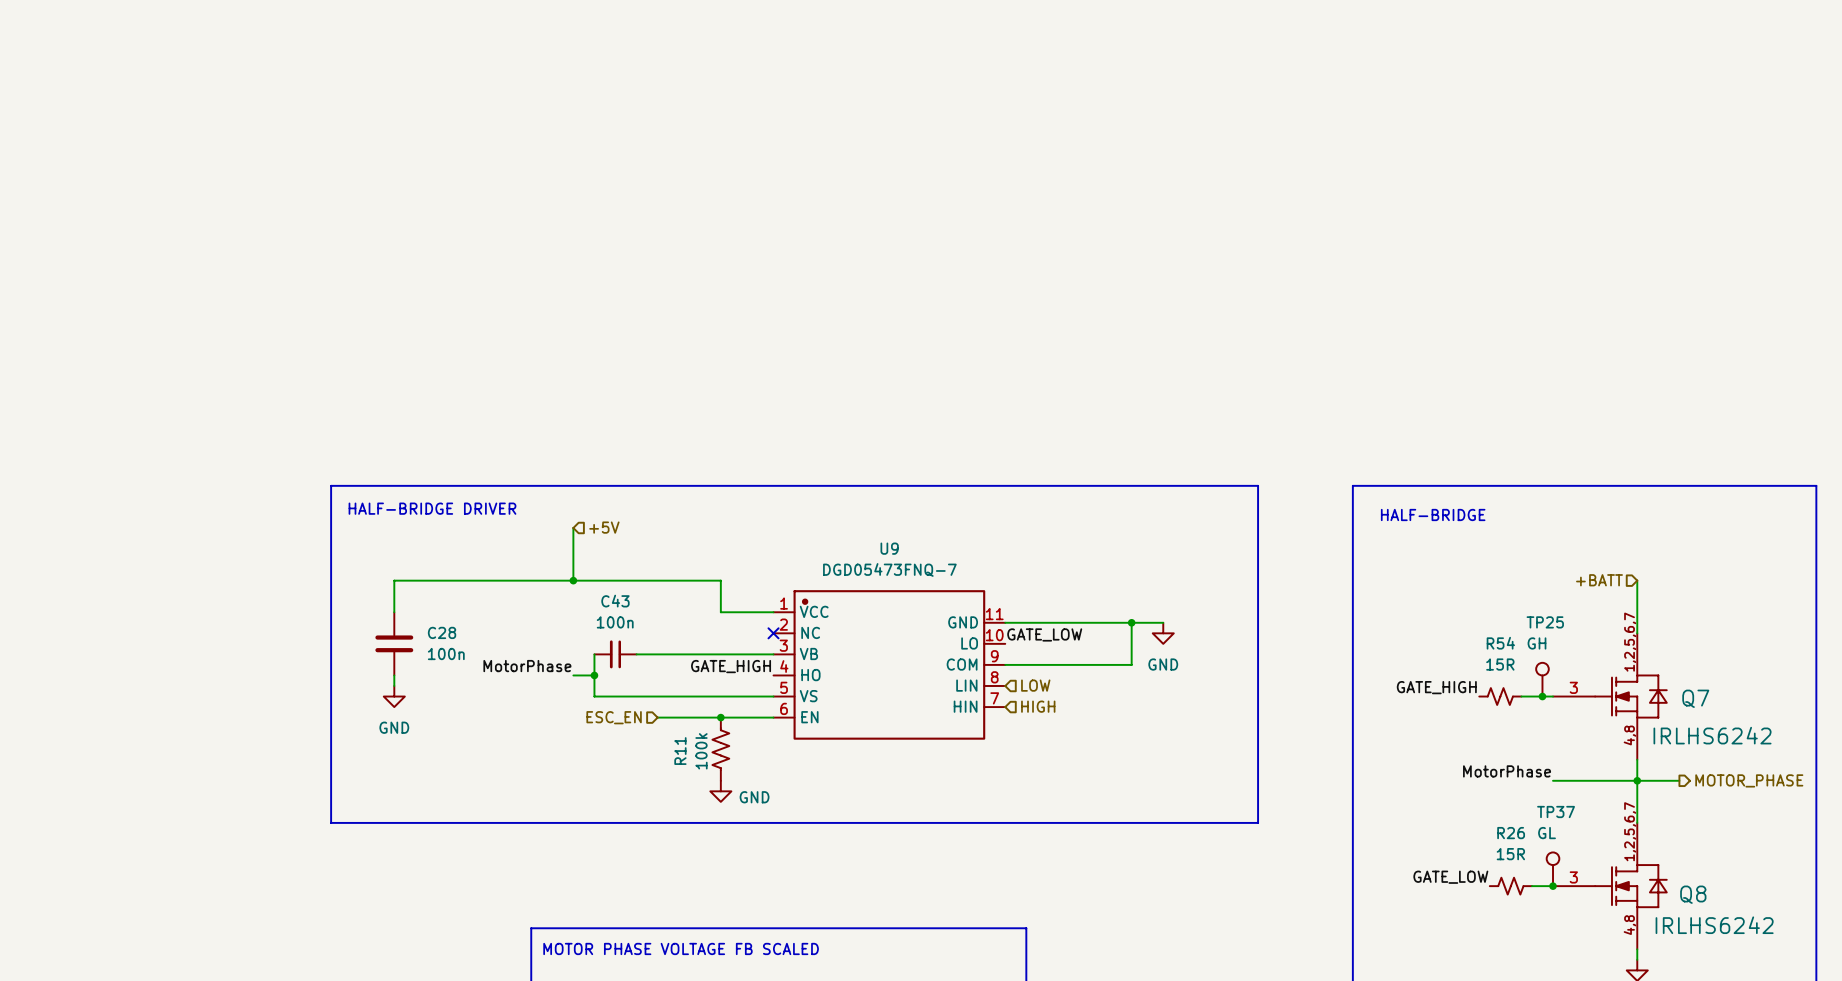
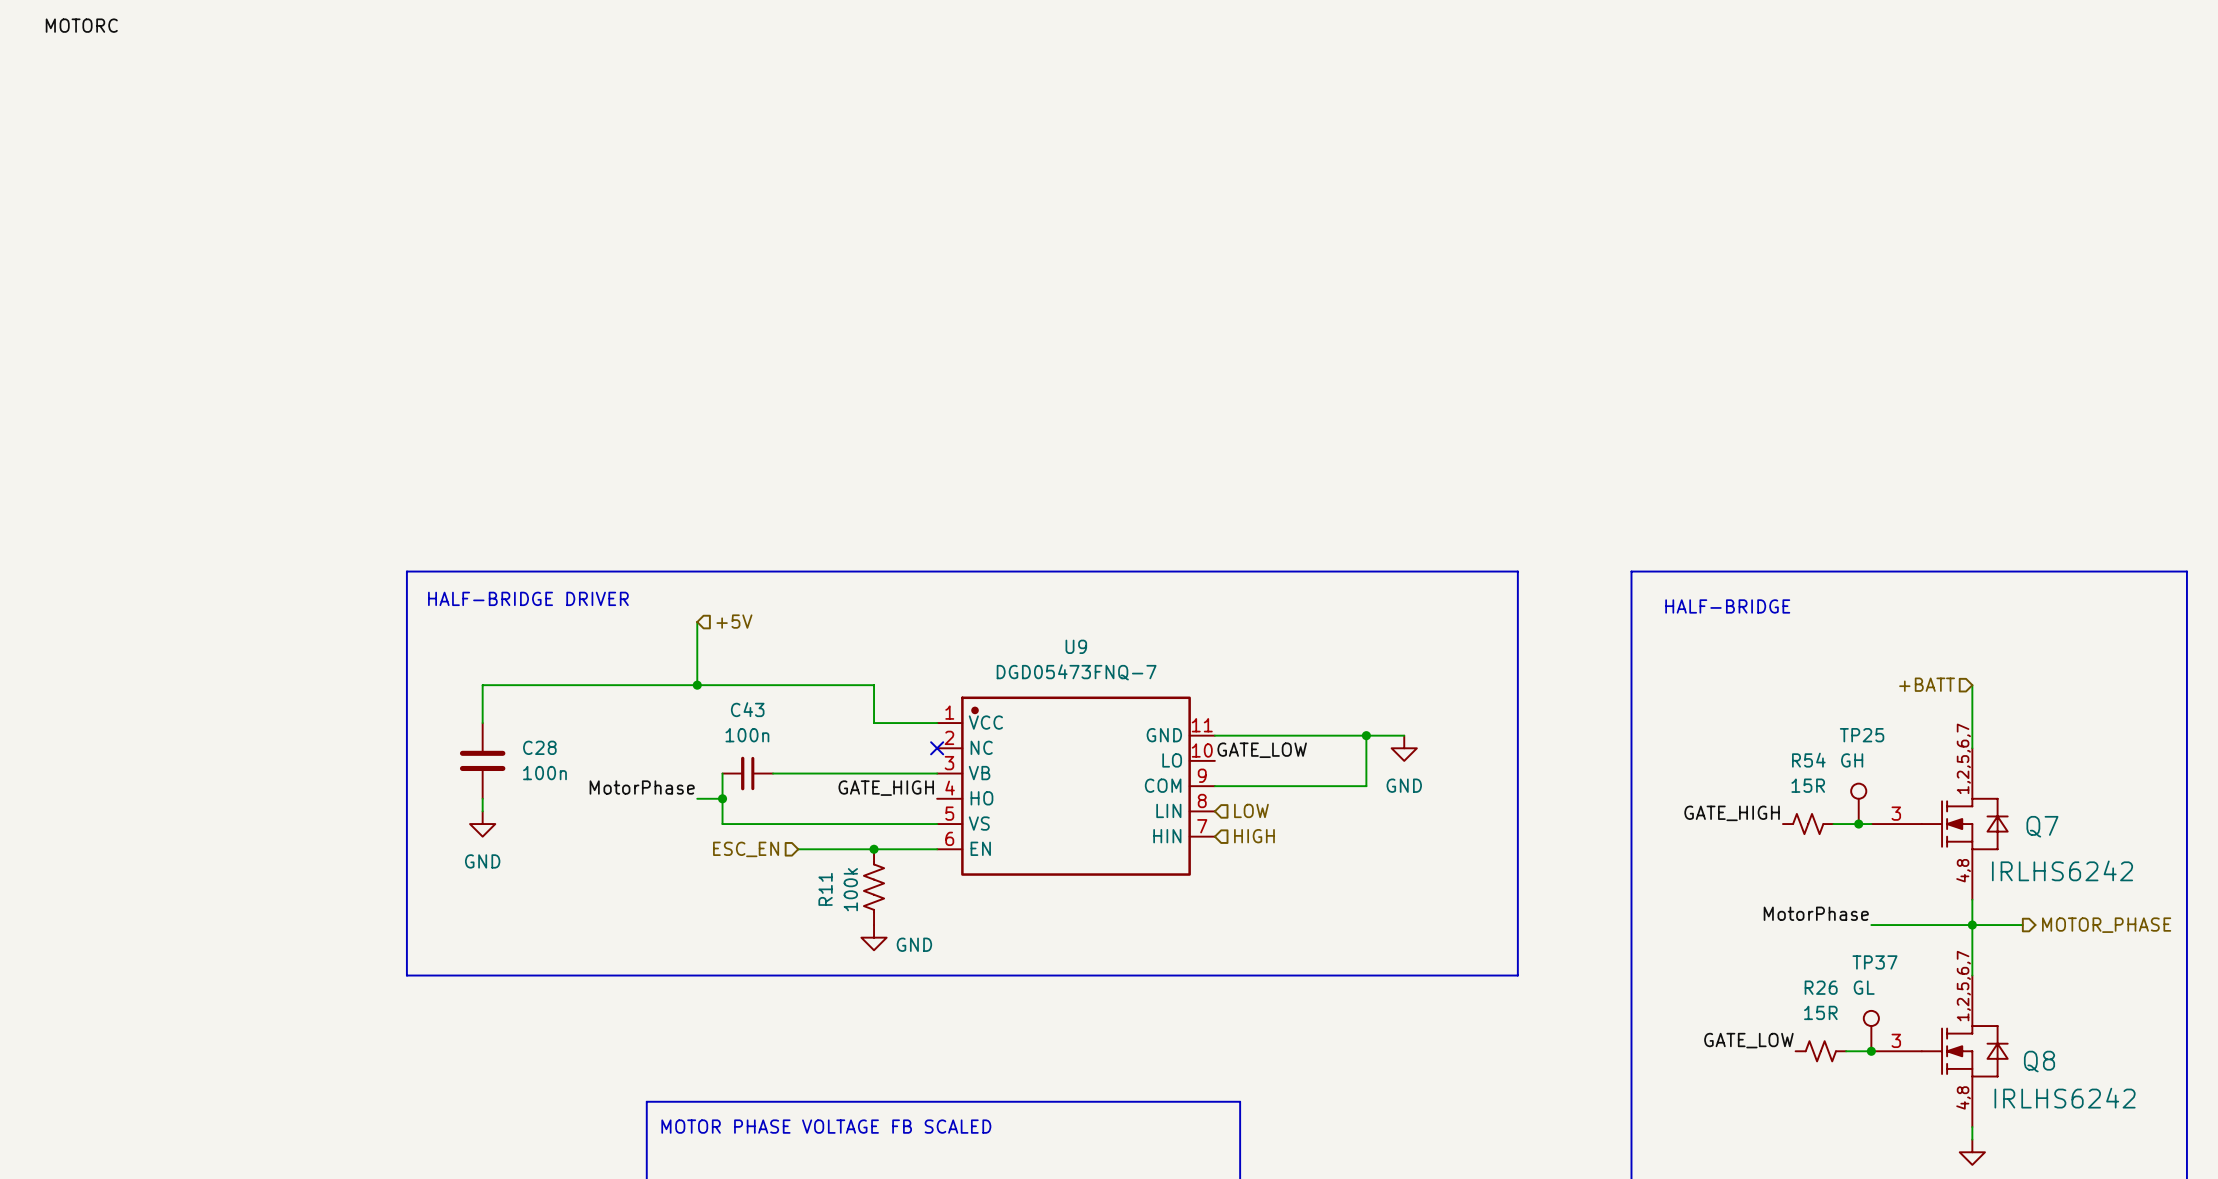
label: none -> MOTORC (81, 25)

